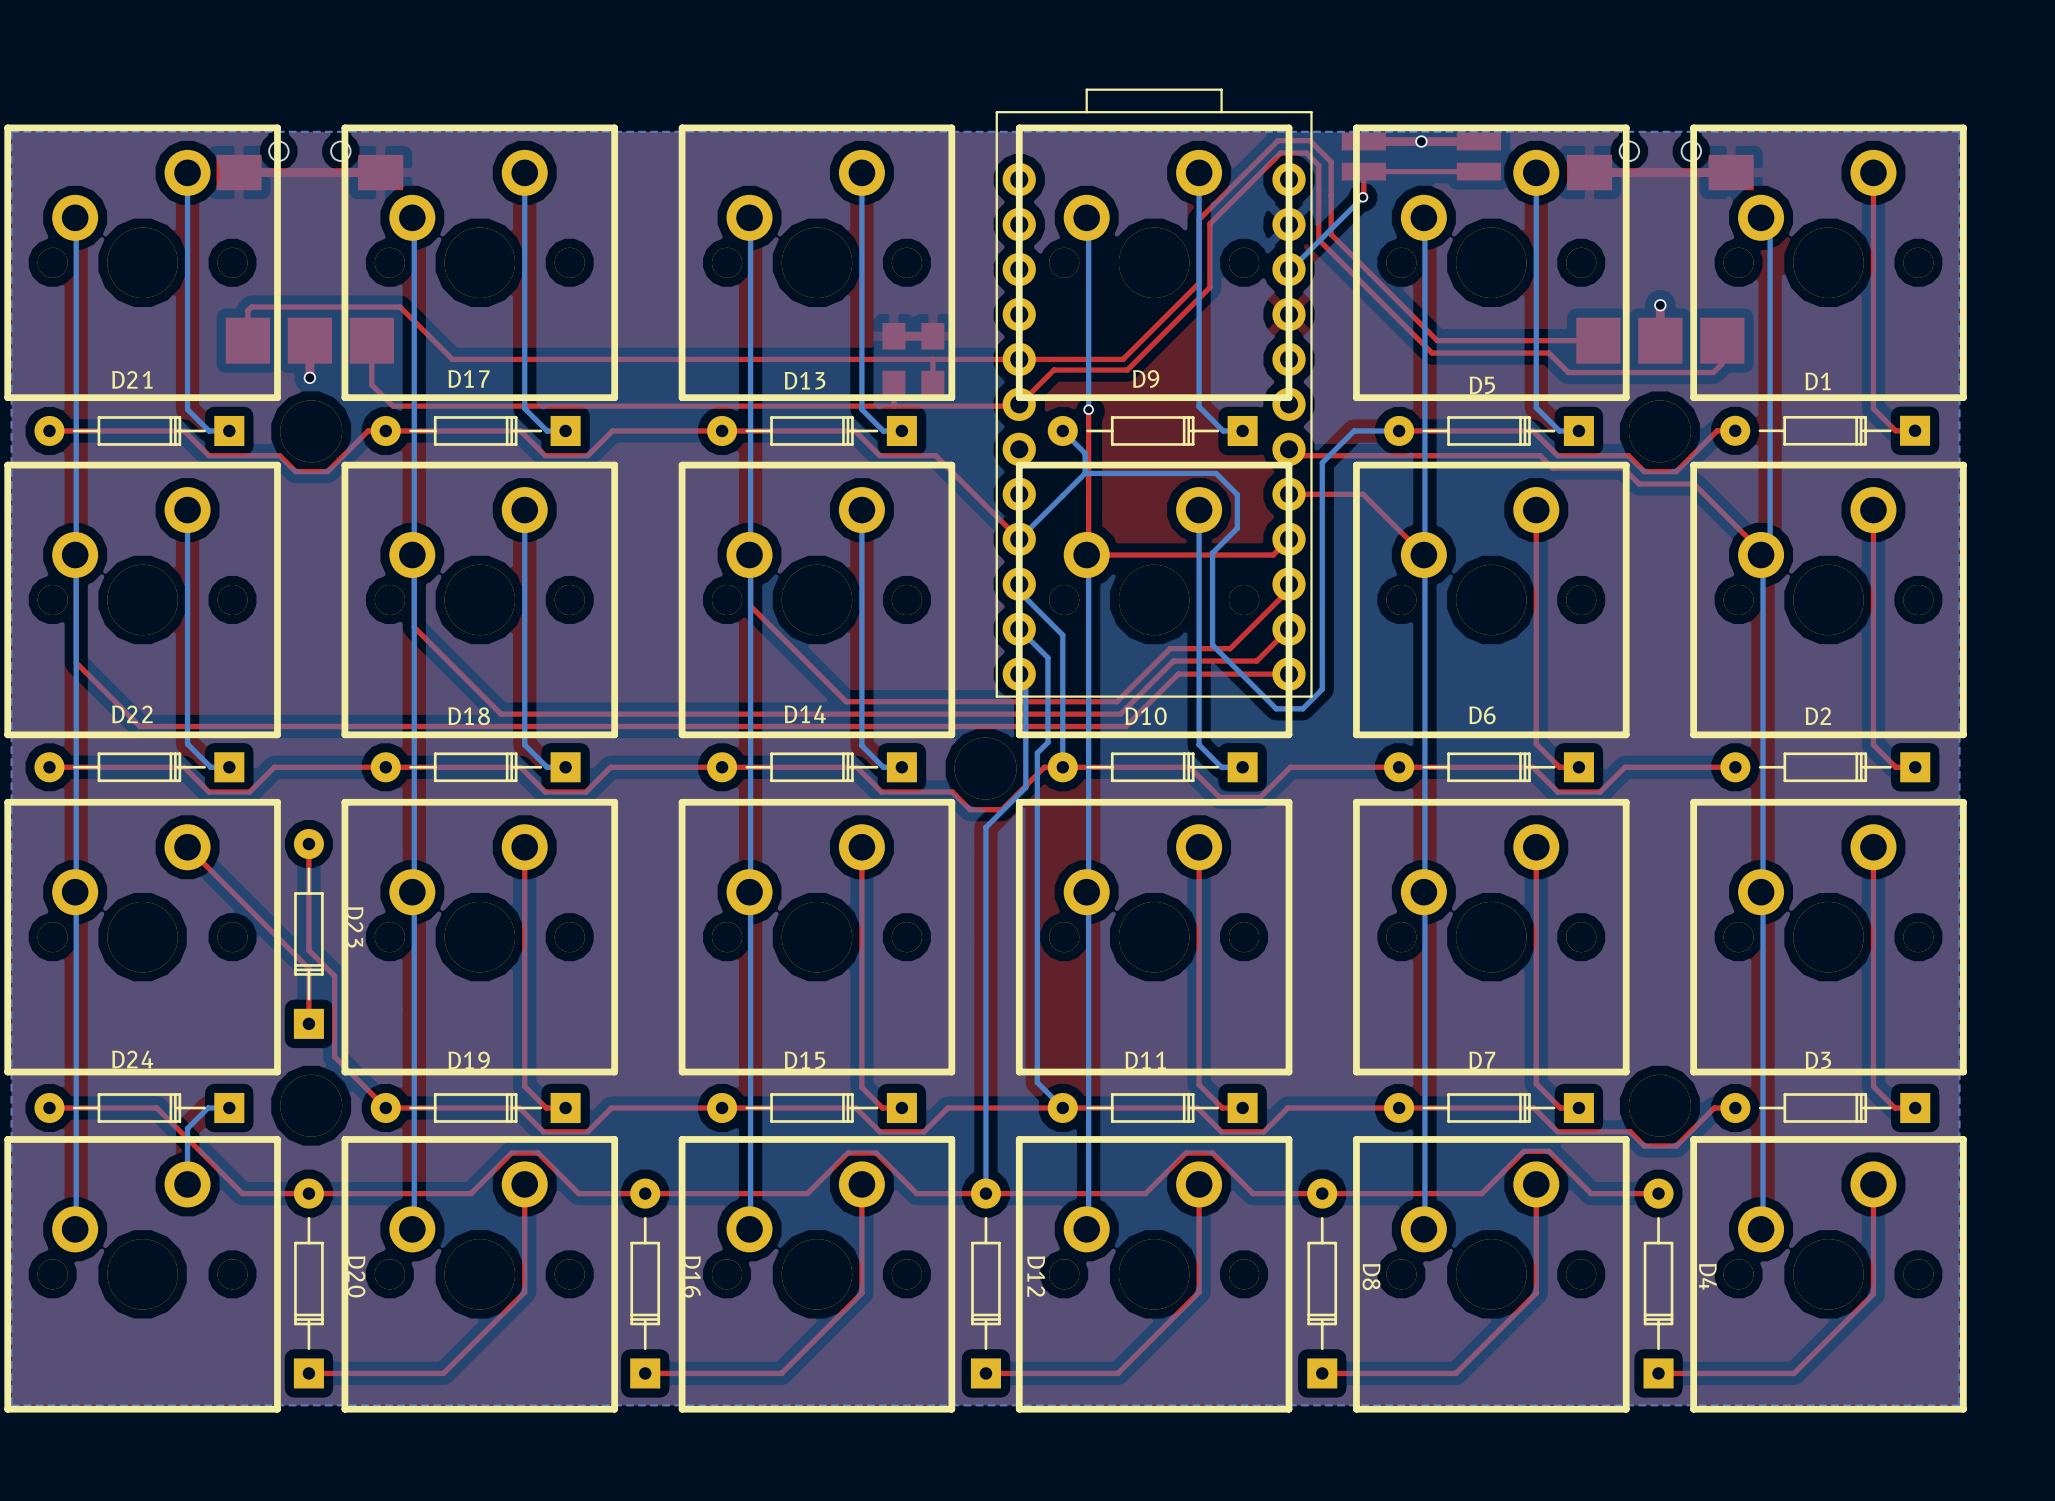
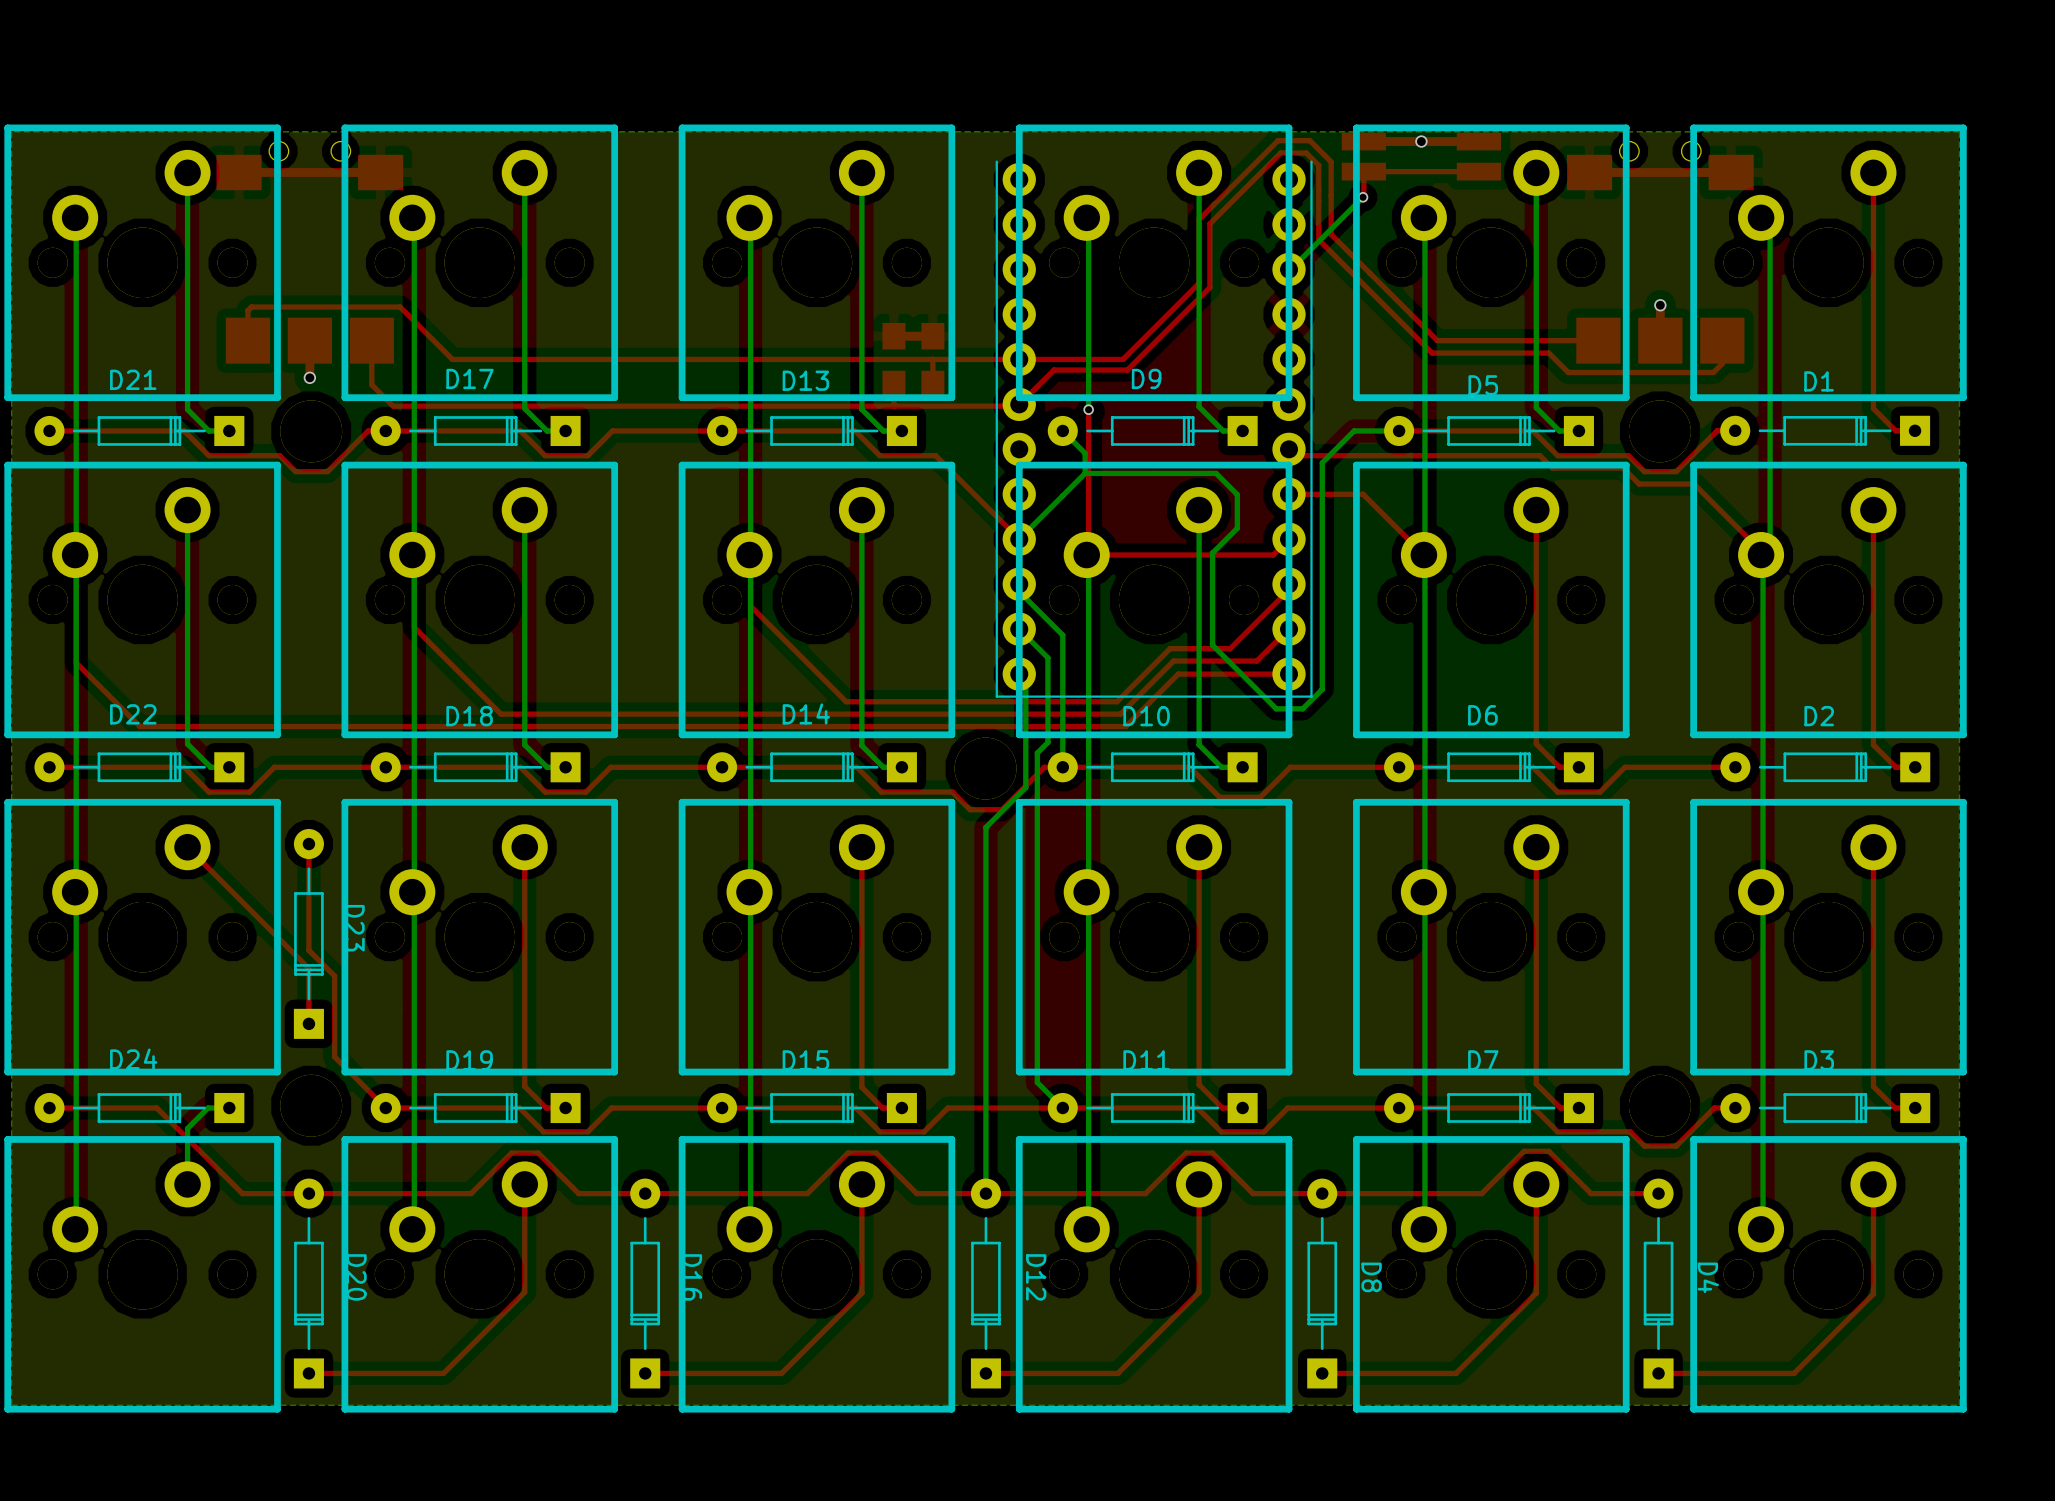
part: (1154, 393) -> none
part: none -> (1154, 429)

